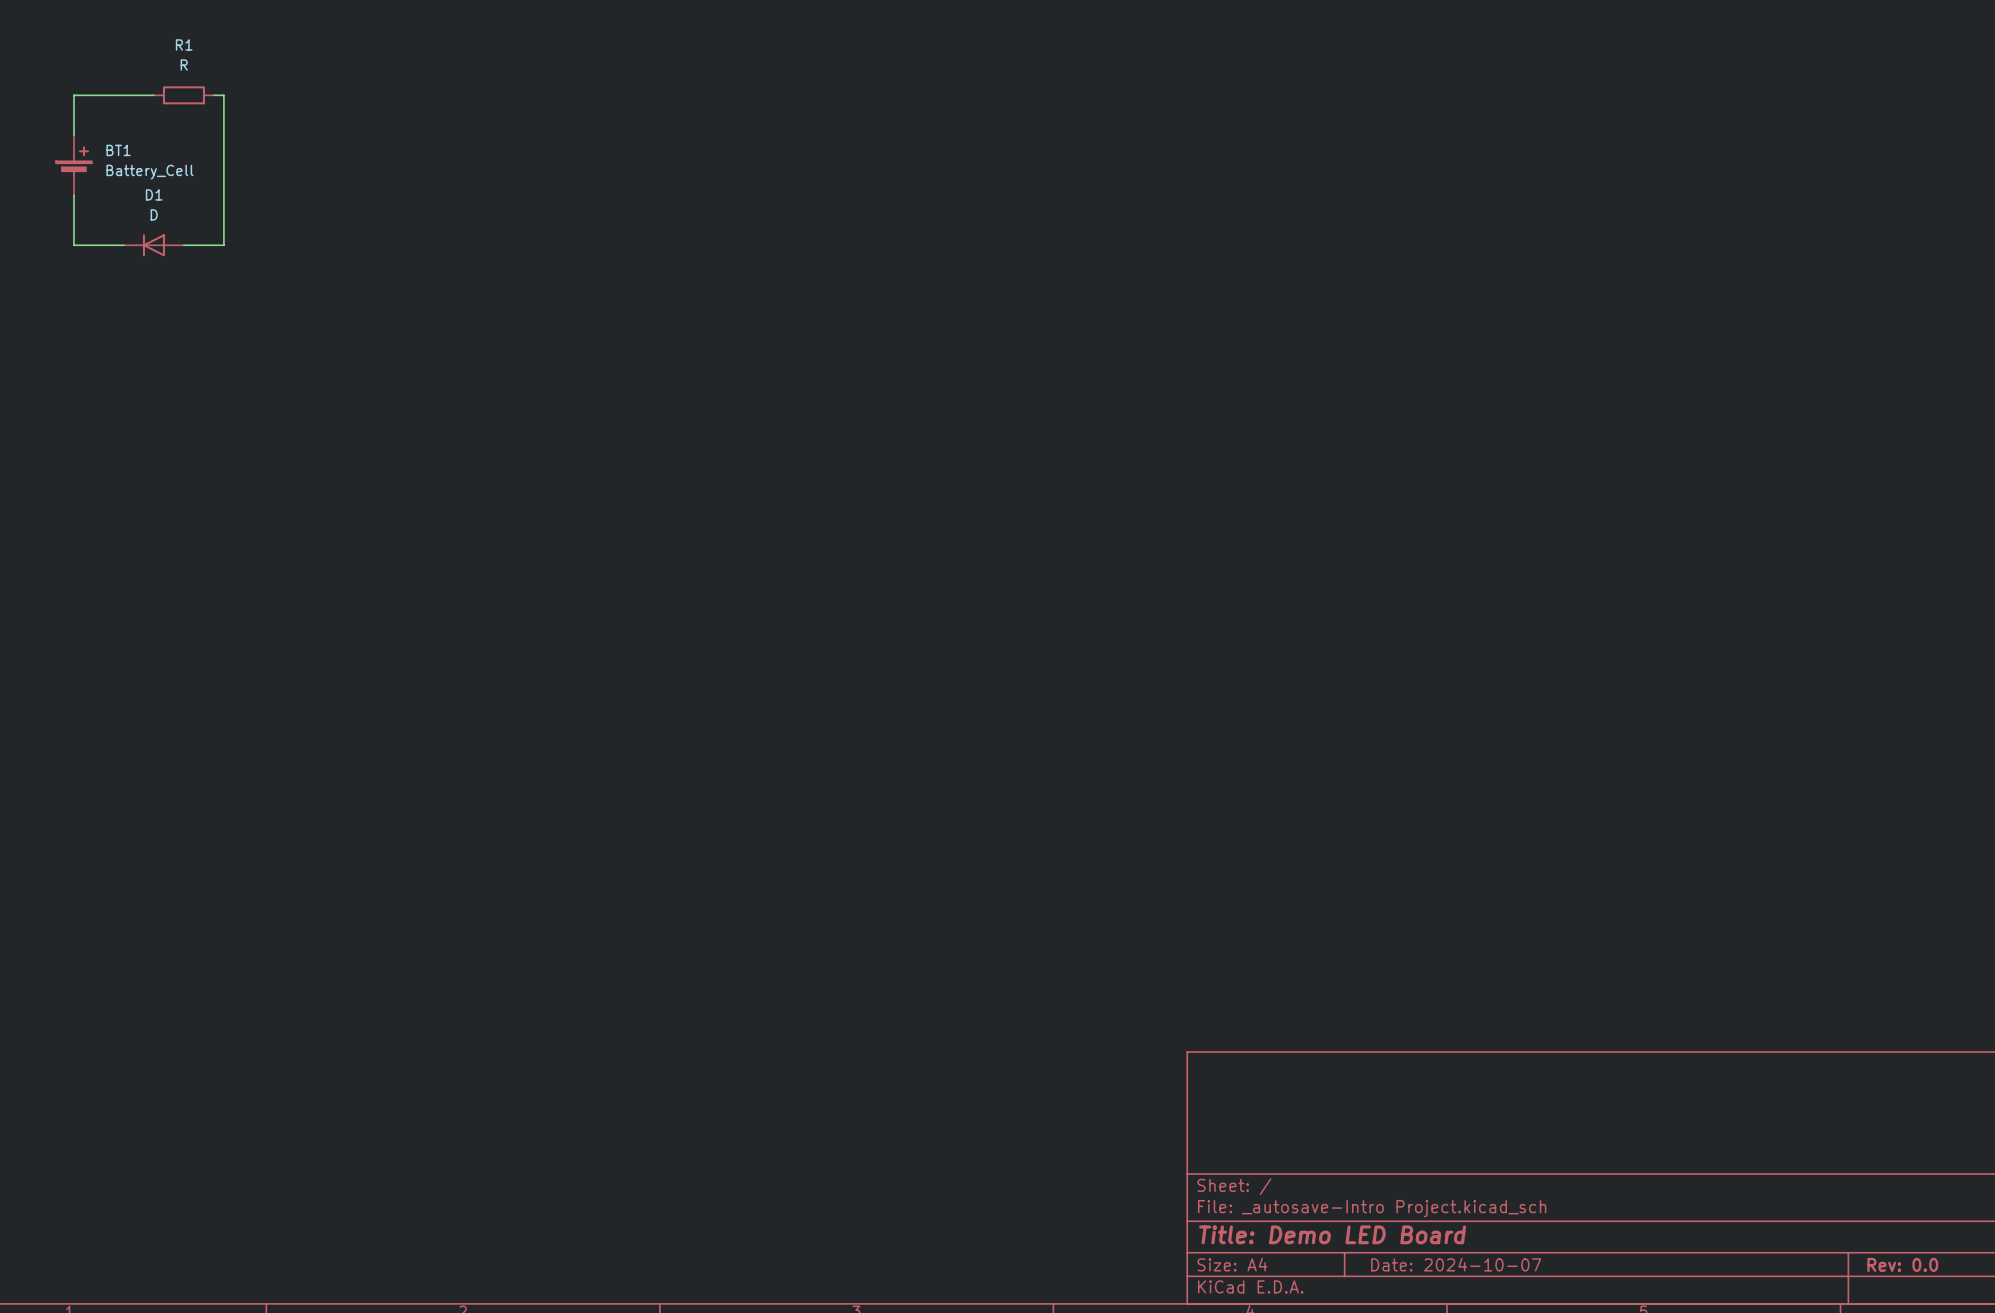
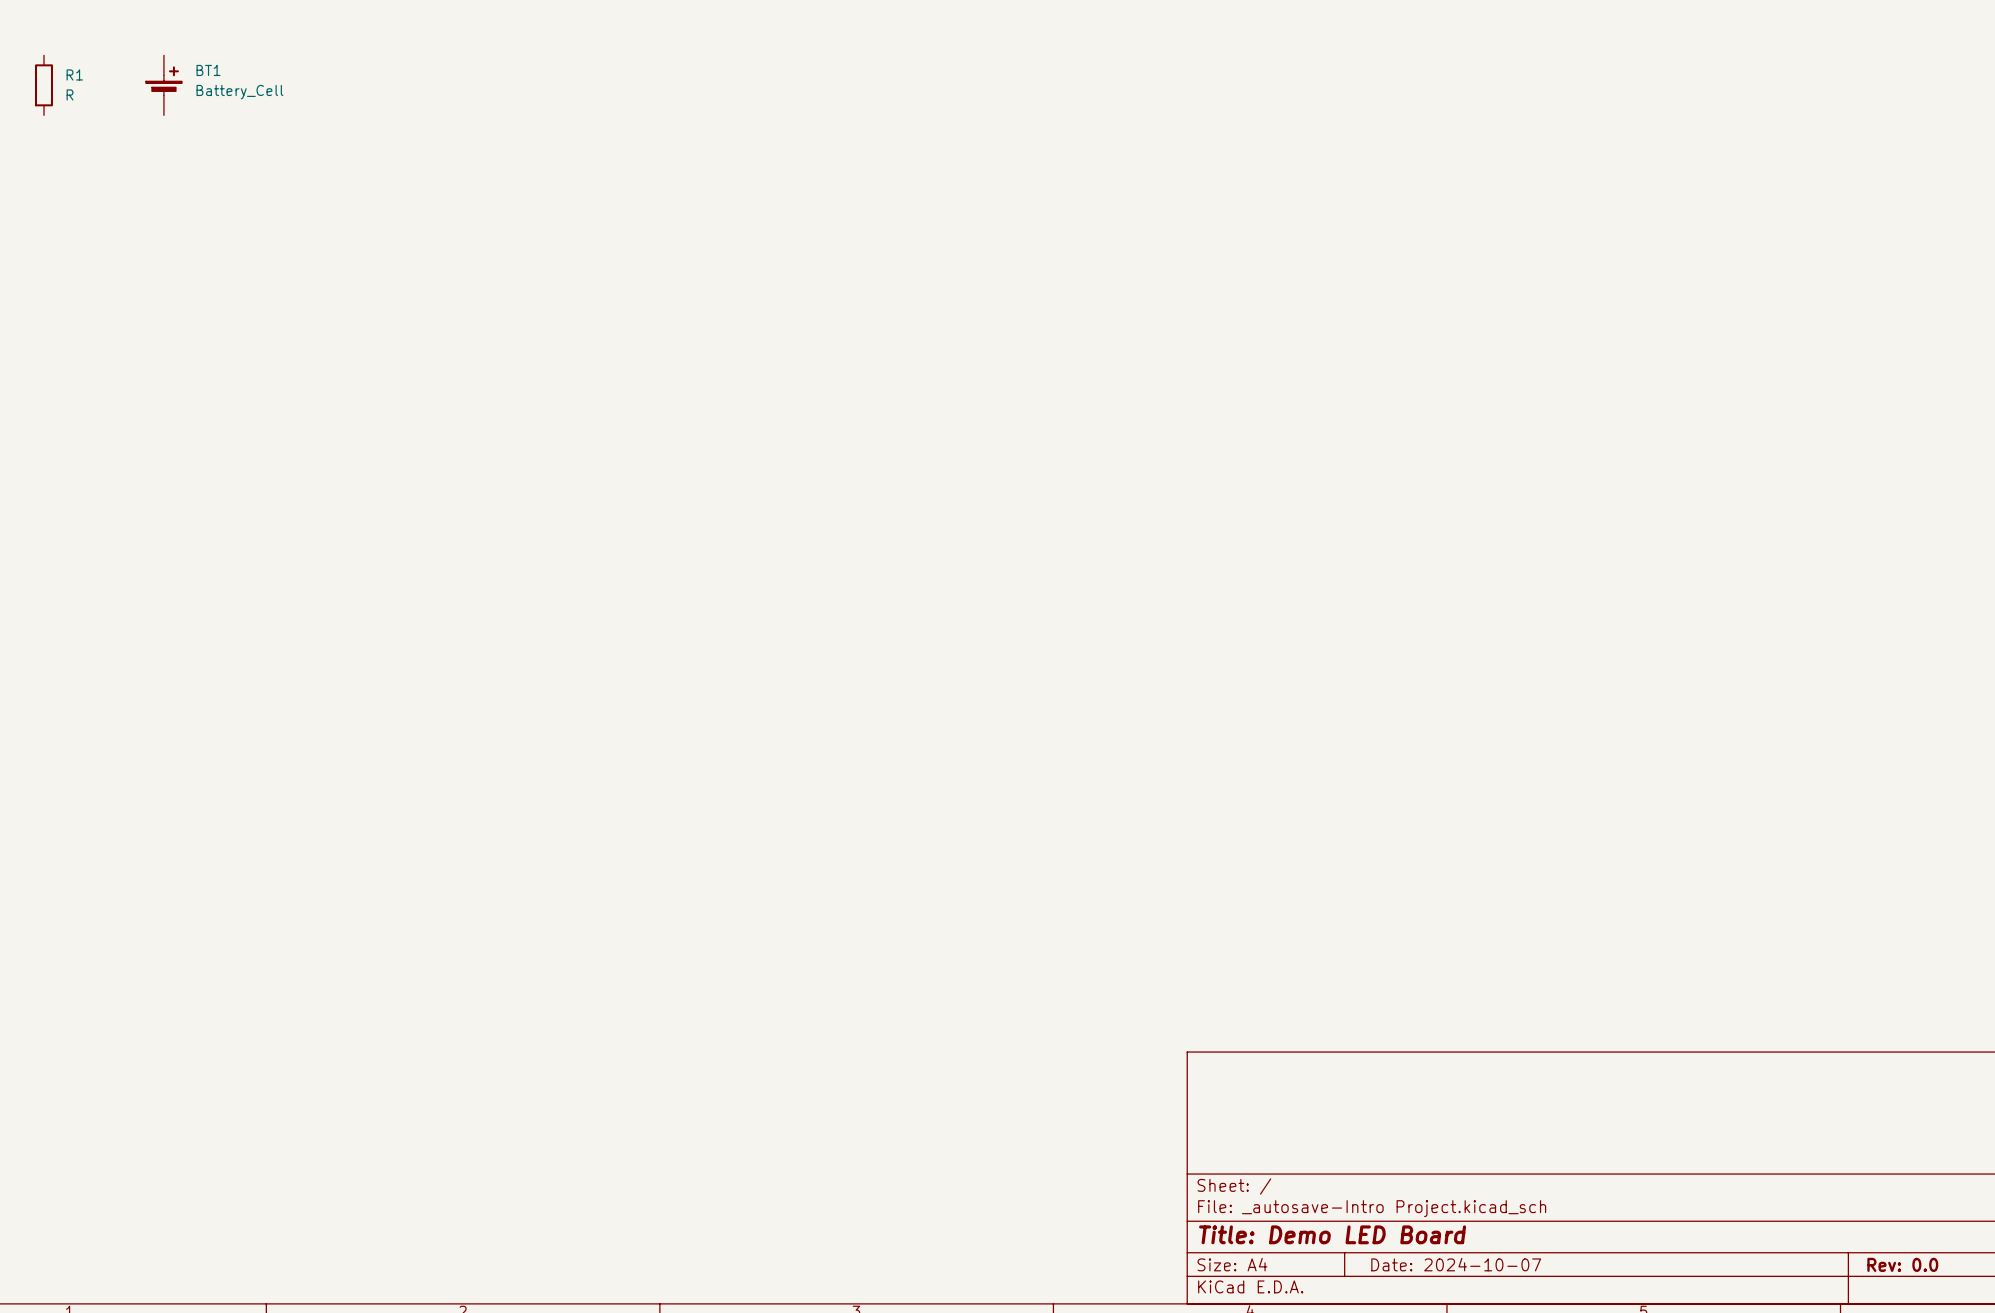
R1 name position: R1 (184, 44) -> R1 (74, 74)
wire: (153, 95) (73, 95) (73, 135) -> none
R1 rotation: 0° (183, 95) -> 90° clockwise (43, 85)
R1 position: (183, 95) -> (43, 85)
wire: (213, 95) (223, 95) (223, 245) (183, 245) -> none
BT1 position: (73, 165) -> (163, 85)
wire: (73, 195) (73, 245) (123, 245) -> none
D1: D (153, 245) -> none

